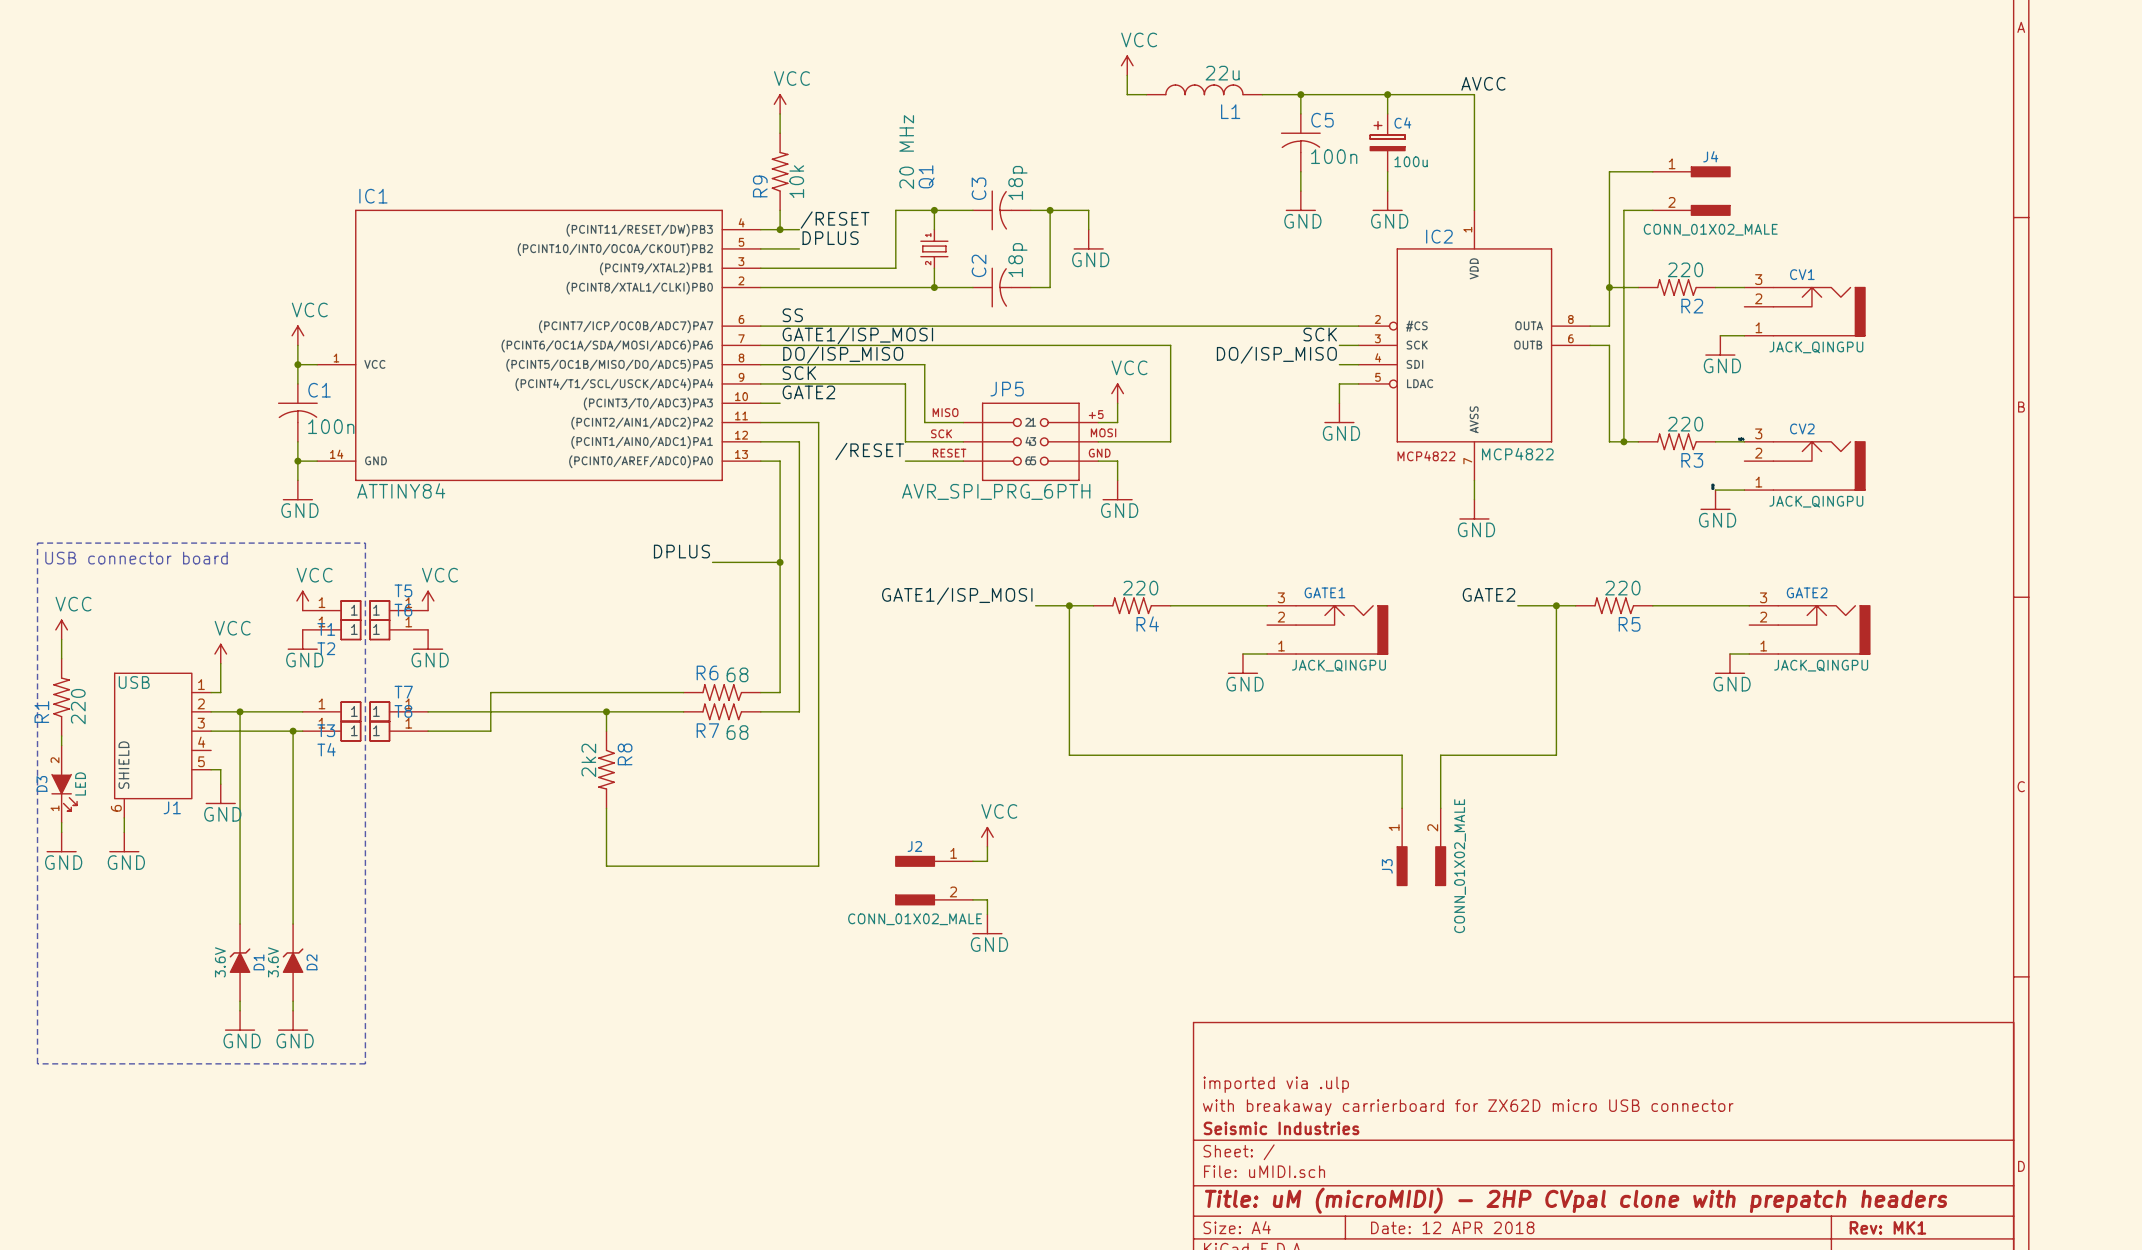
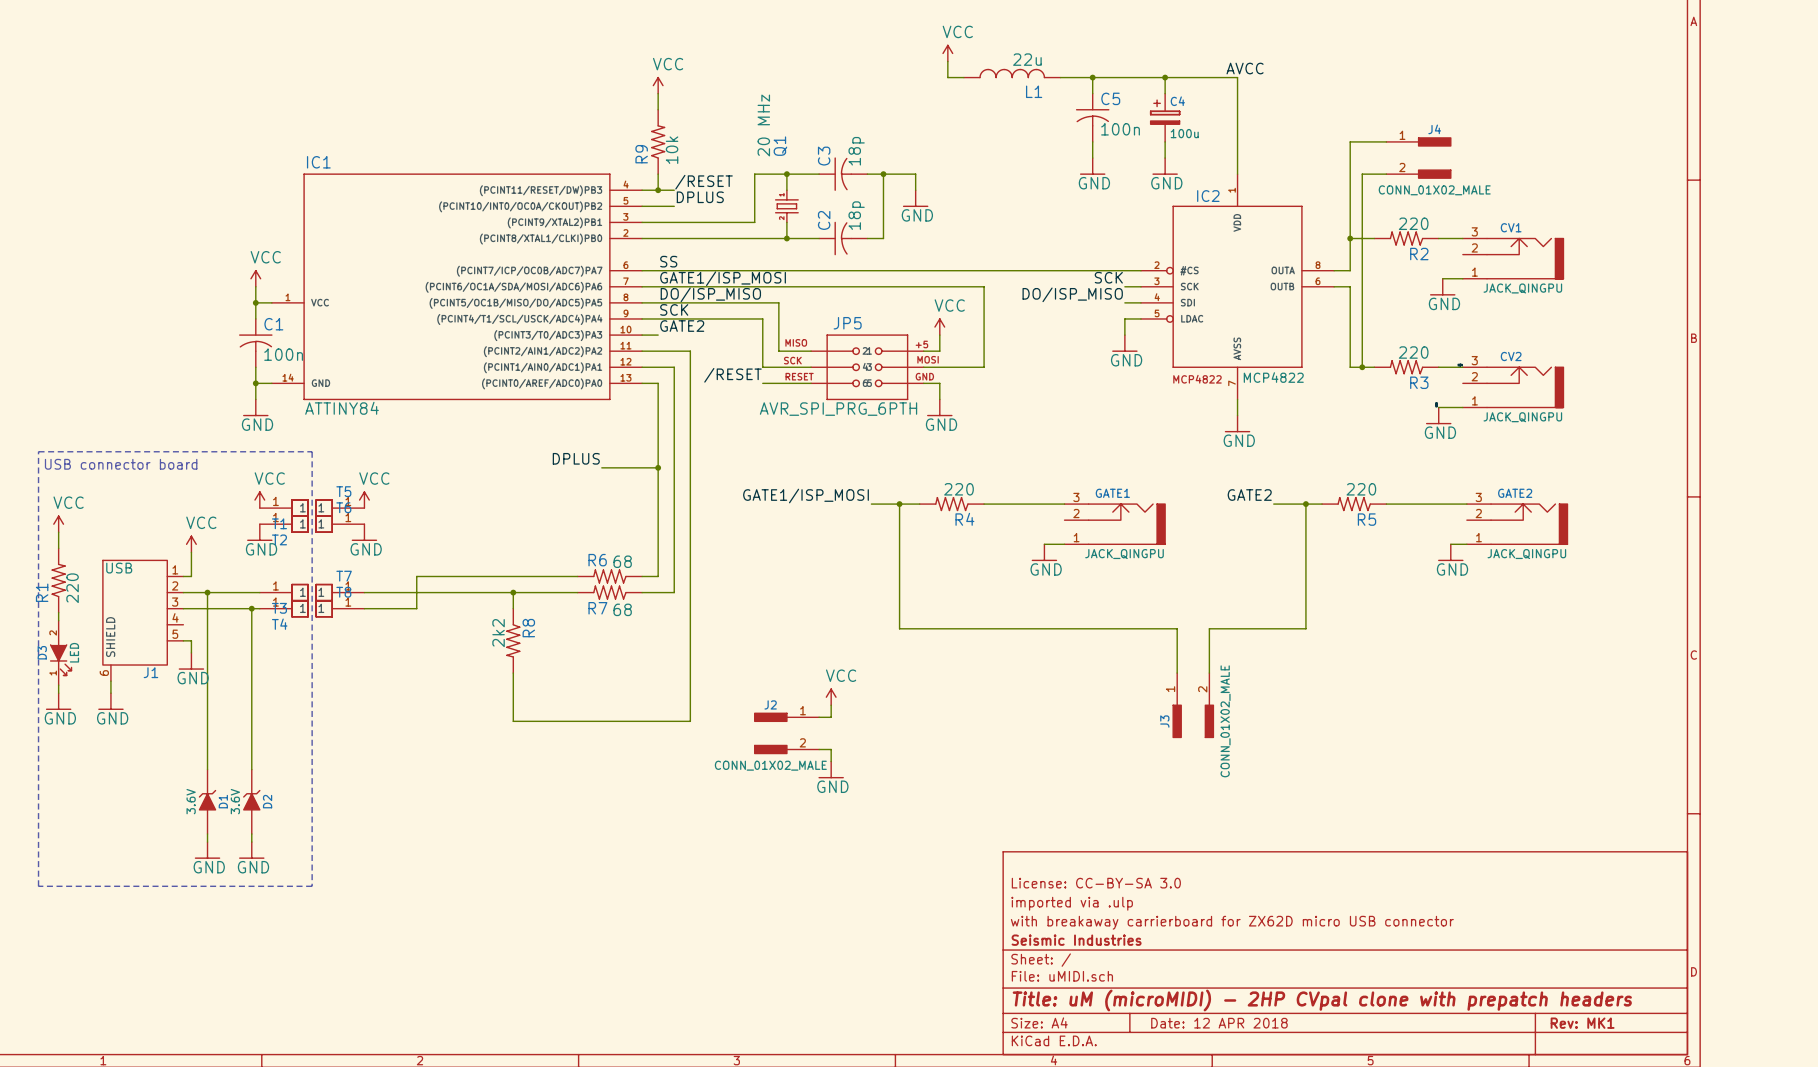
title block: none -> License: CC-BY-SA 3.0 (1096, 883)

